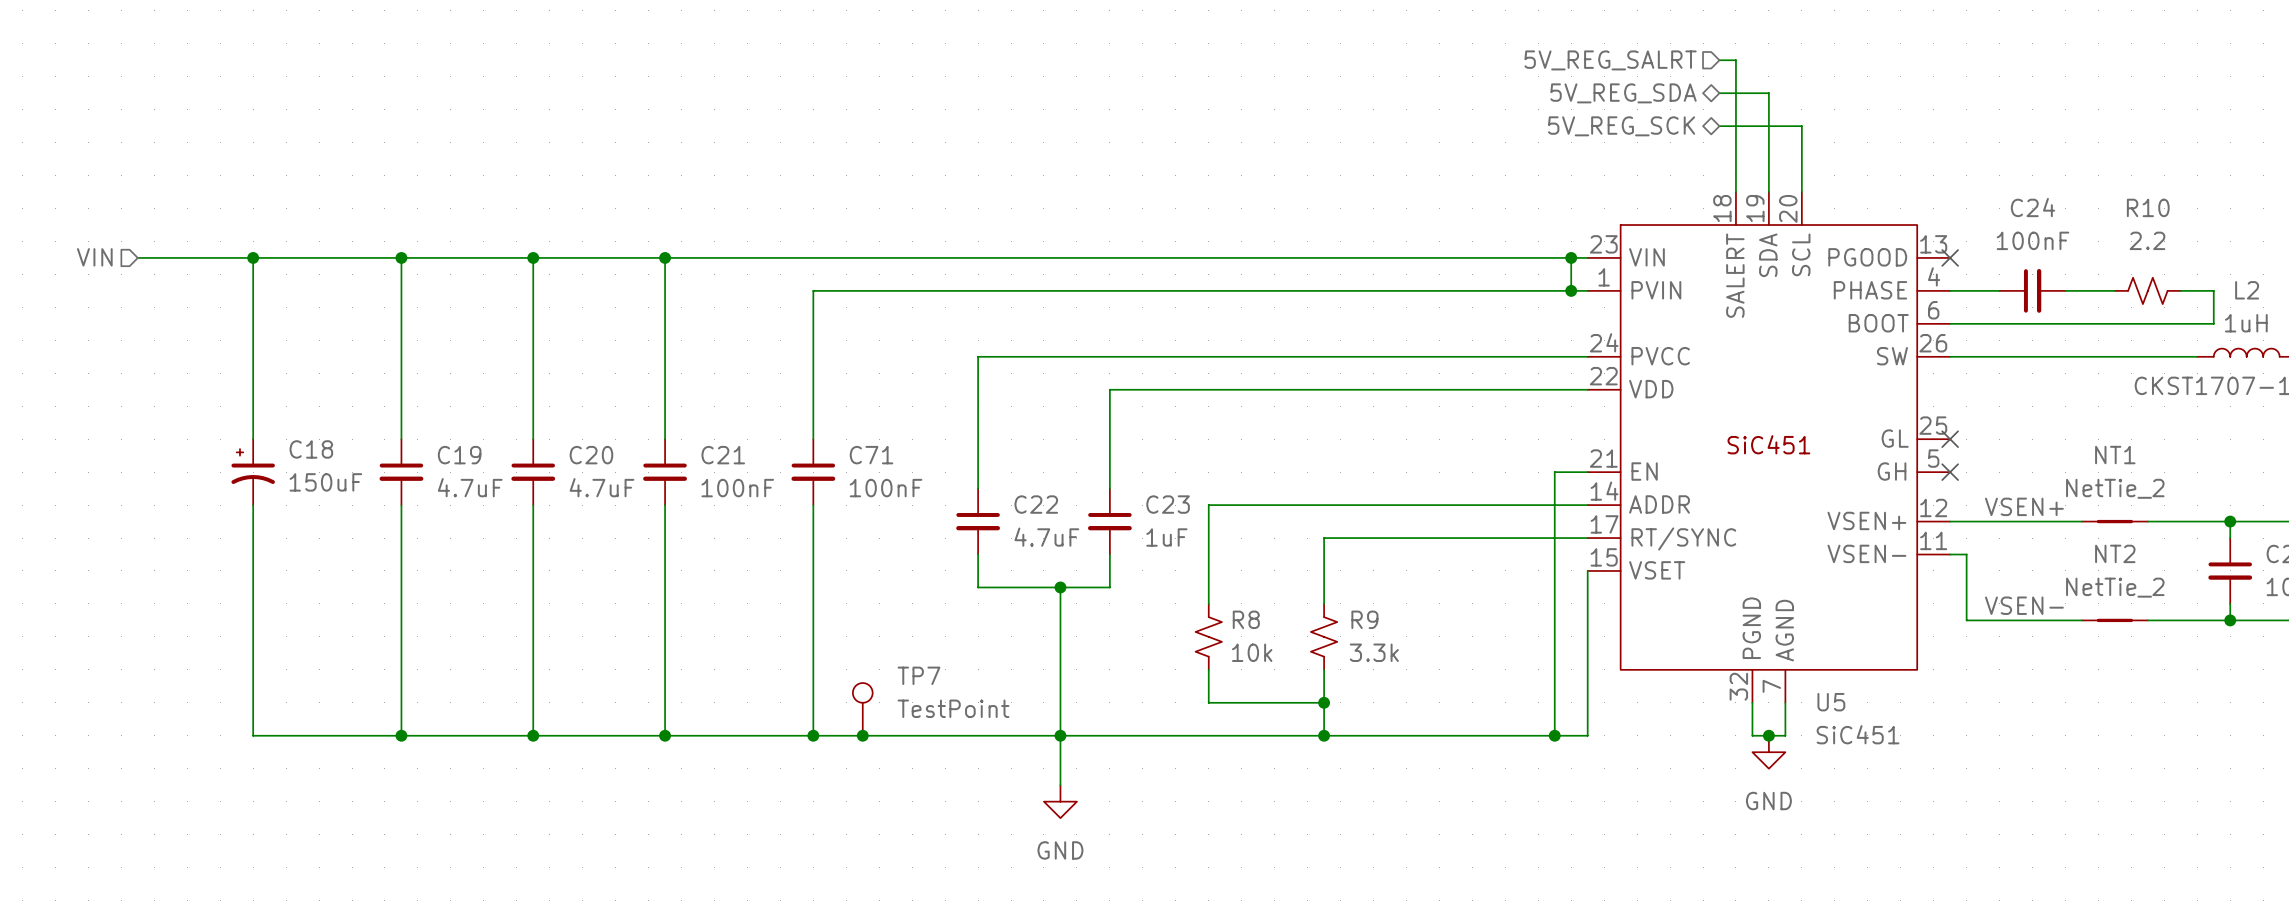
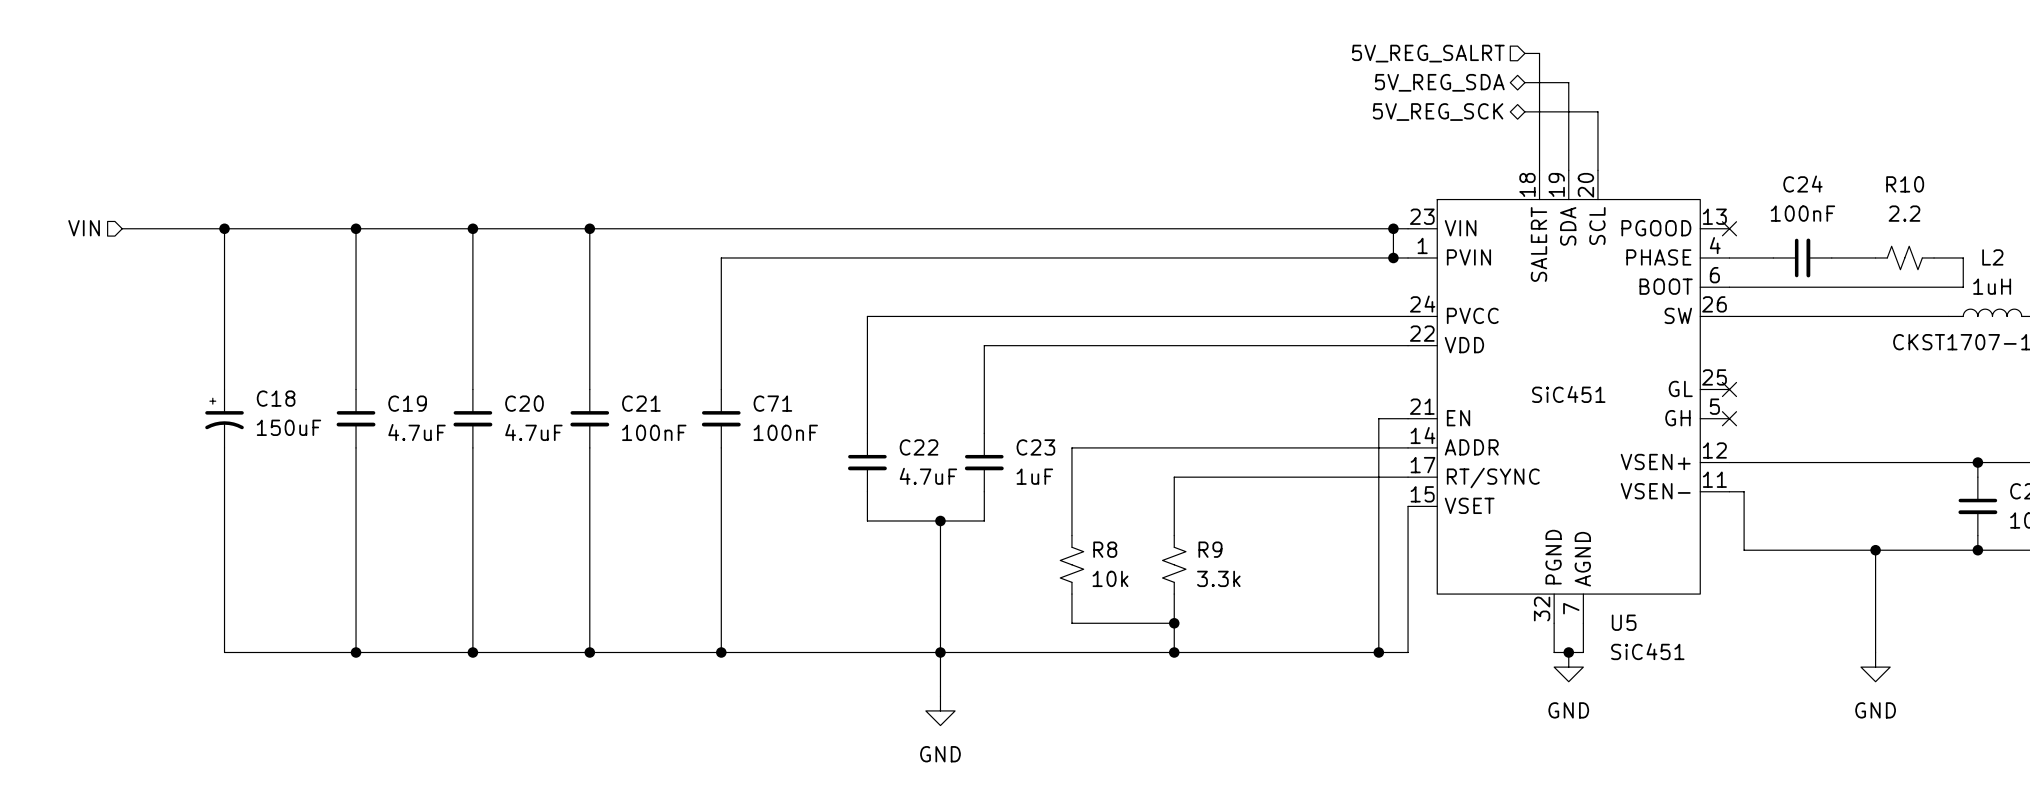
label: VSEN+ (2024, 506) -> none
NT1: NetTie_2 (2114, 521) -> none
label: VSEN- (2024, 605) -> none
wire: none -> (1875, 550) (1875, 652)
junction: none -> (1875, 550)
NT2: NetTie_2 (2114, 620) -> none
TP7: TestPoint (862, 709) -> none
junction: (862, 735) -> none
power symbol: none -> GND (1875, 667)

